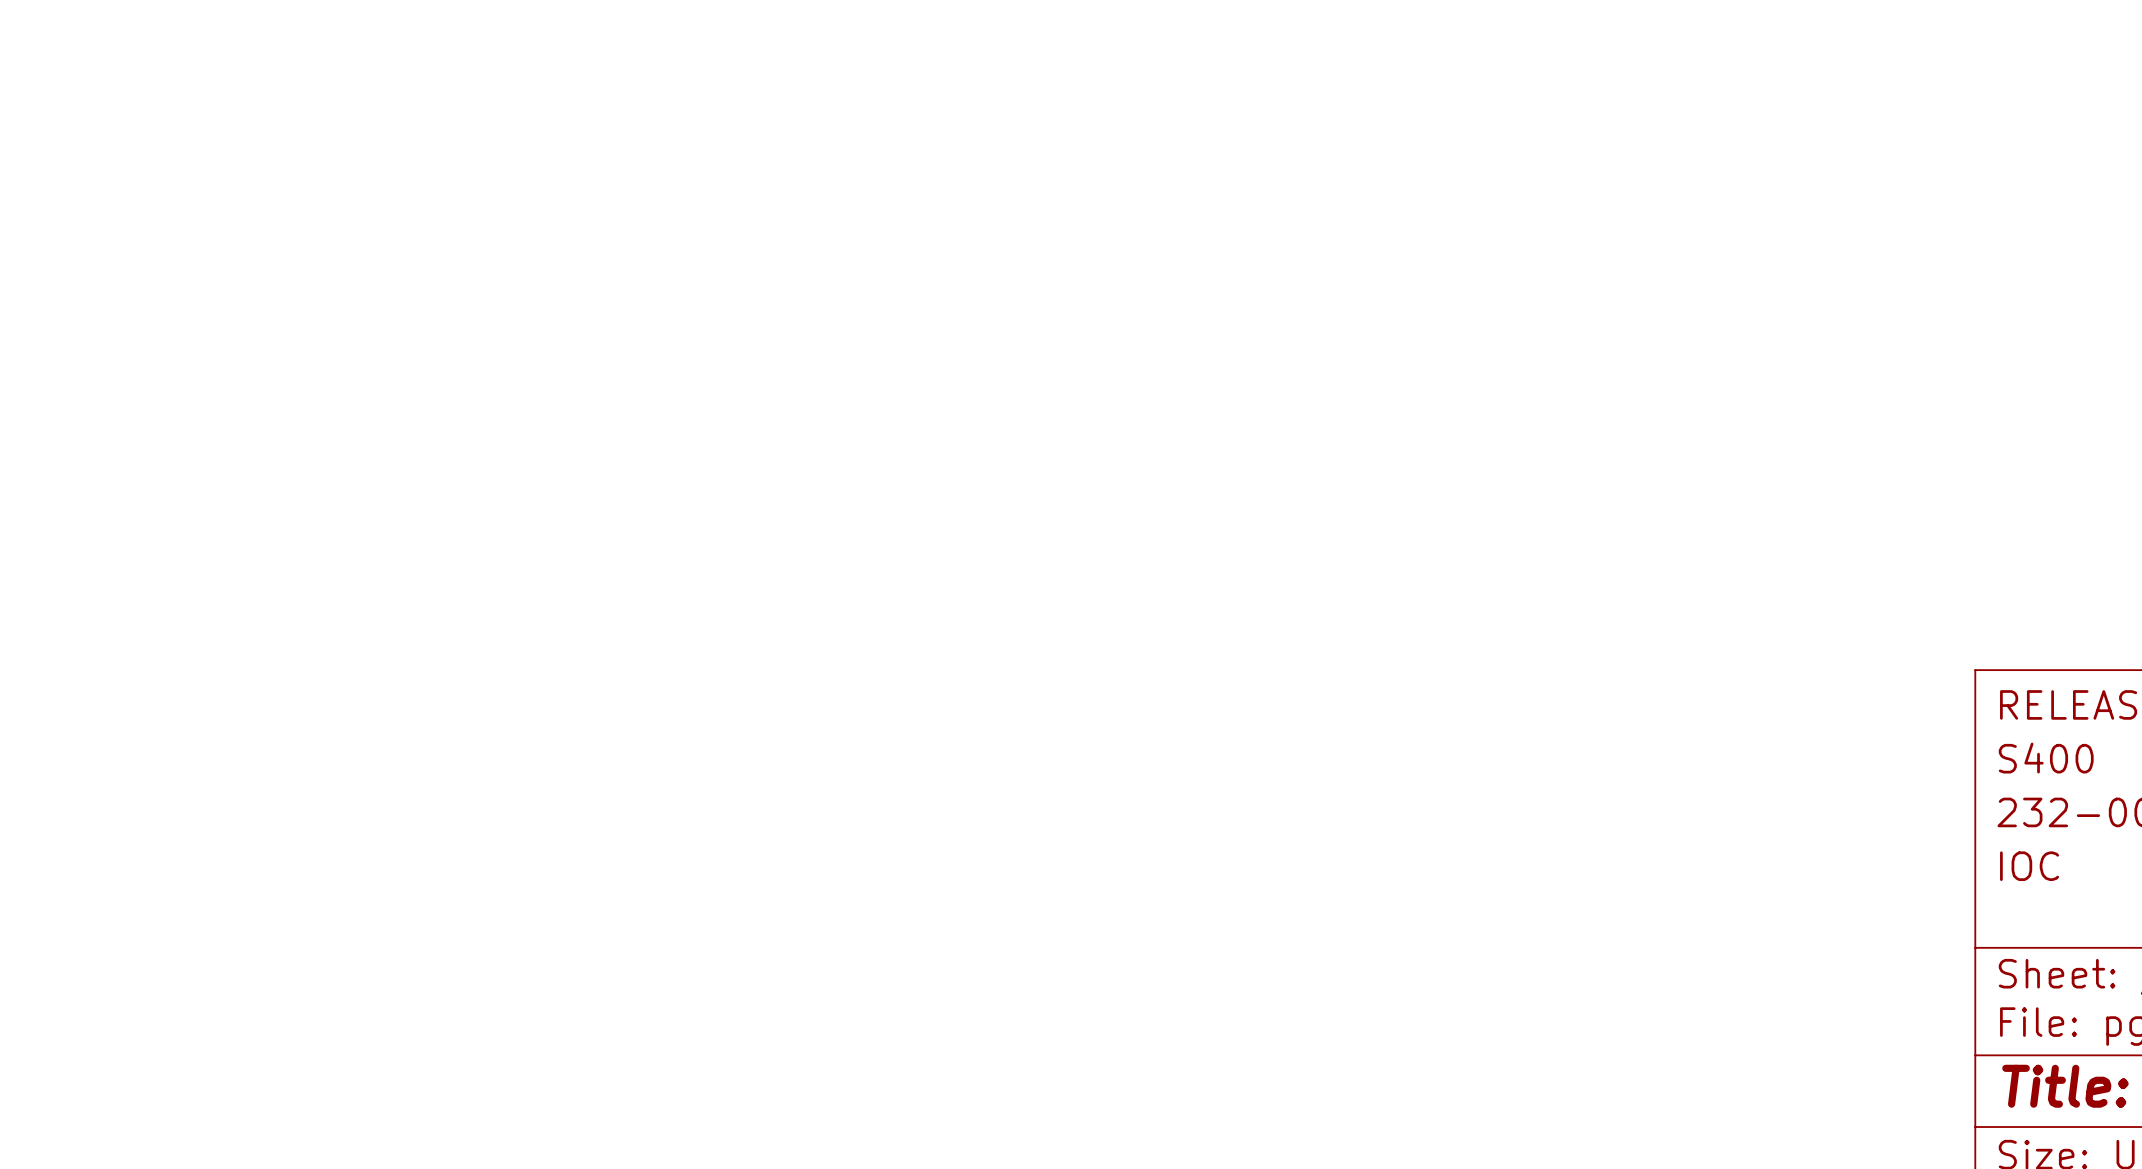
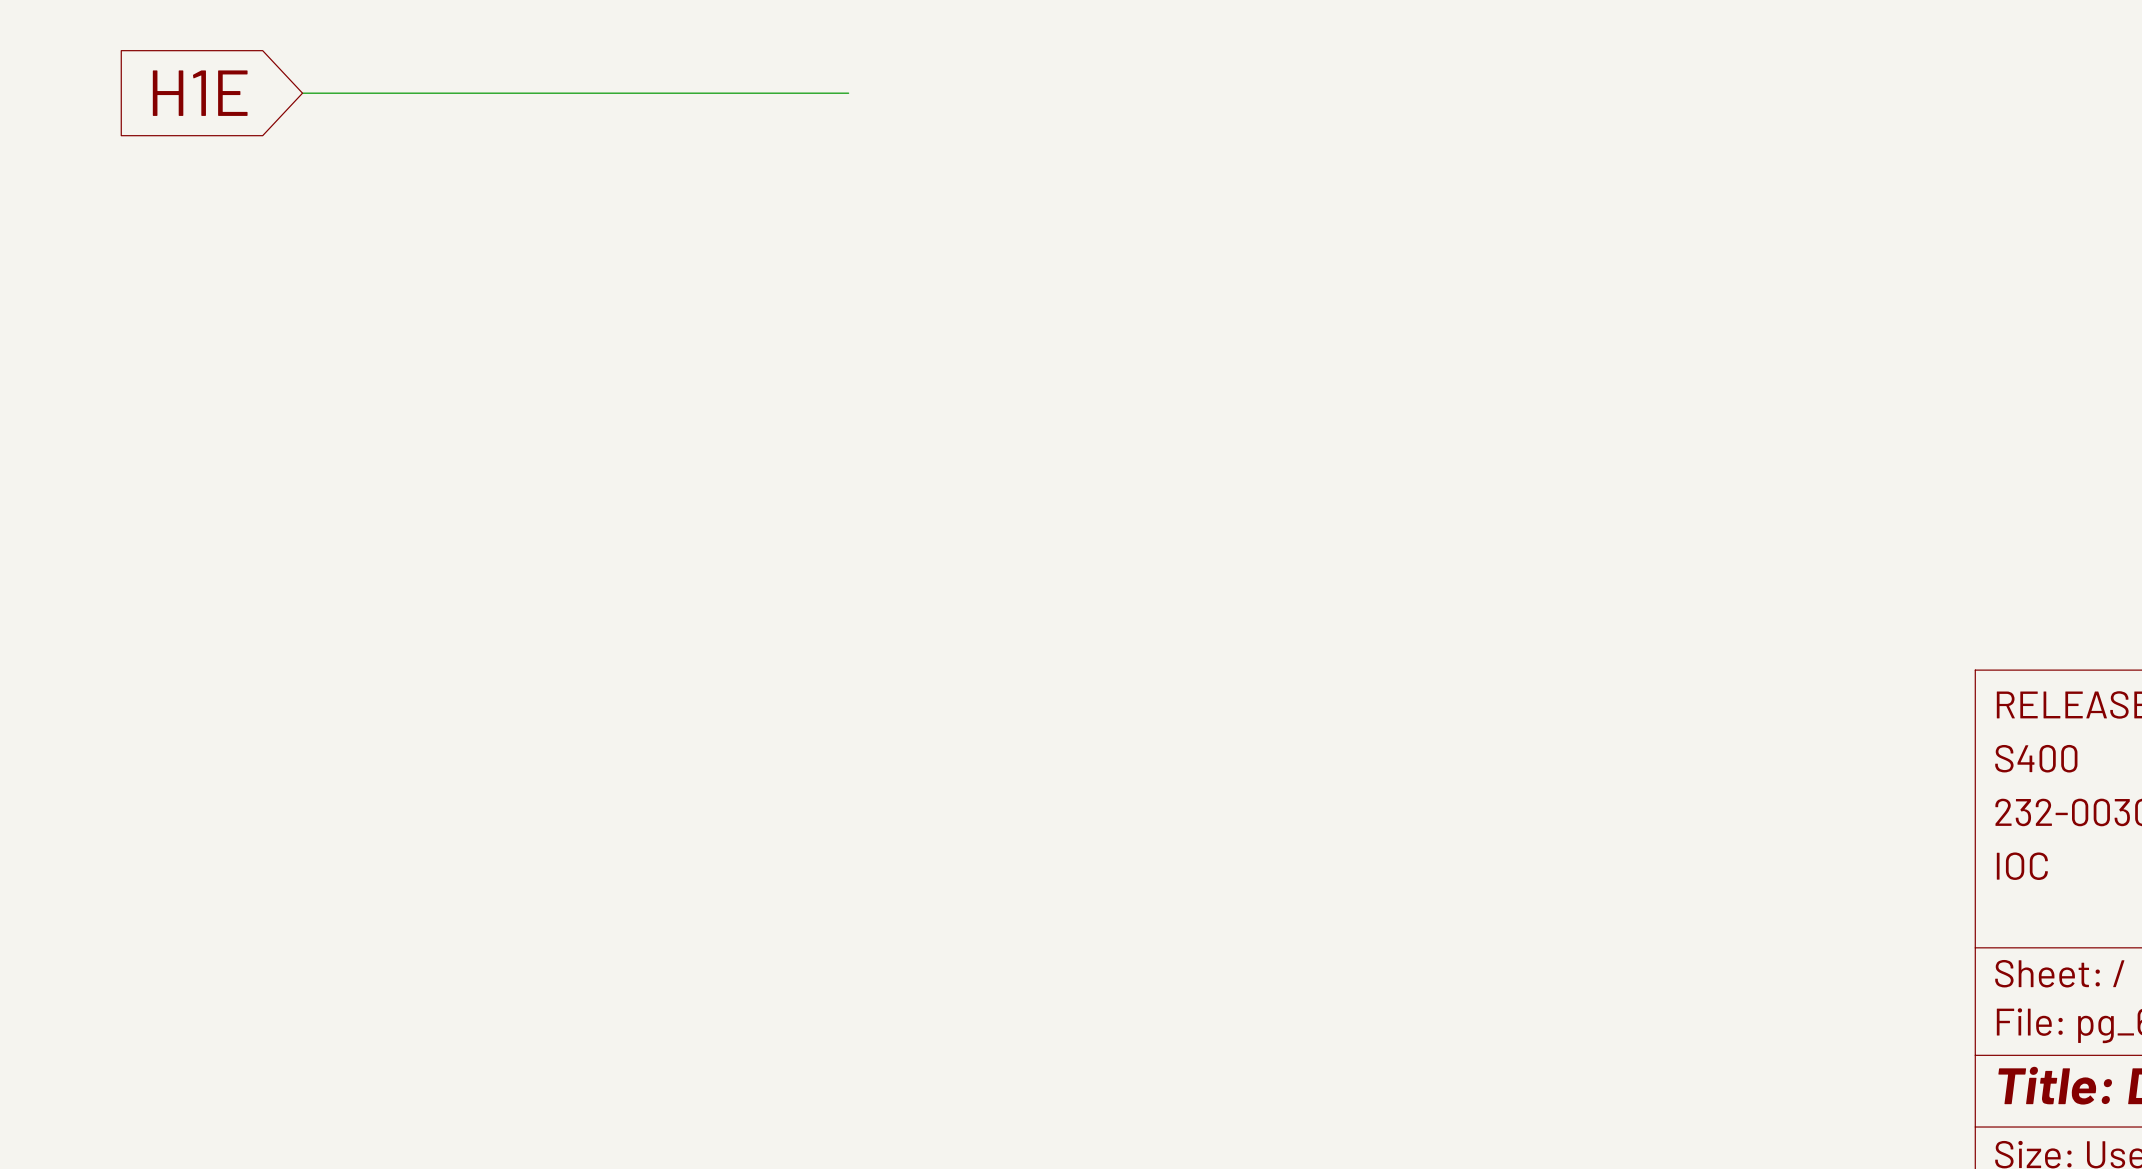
global label: none -> H1E (200, 93)
wire: none -> (302, 93) (848, 93)

